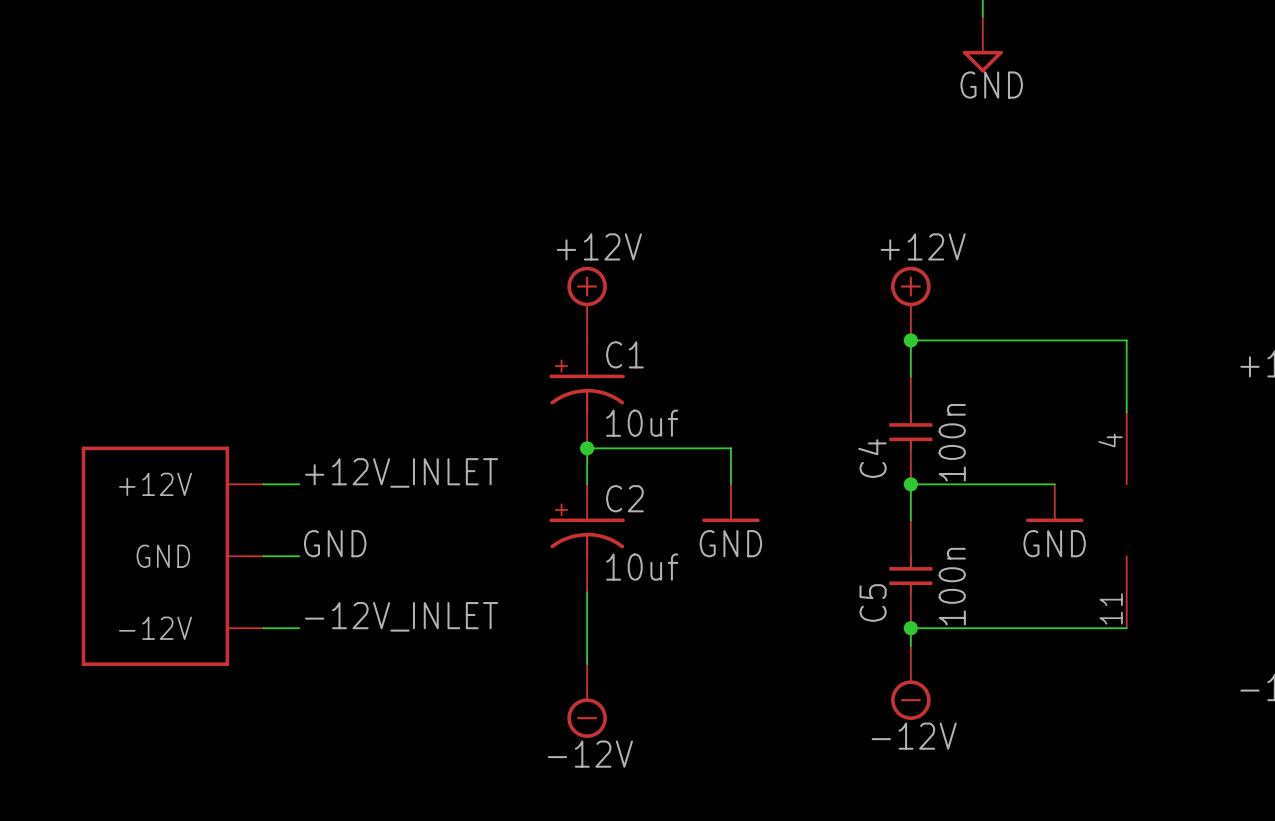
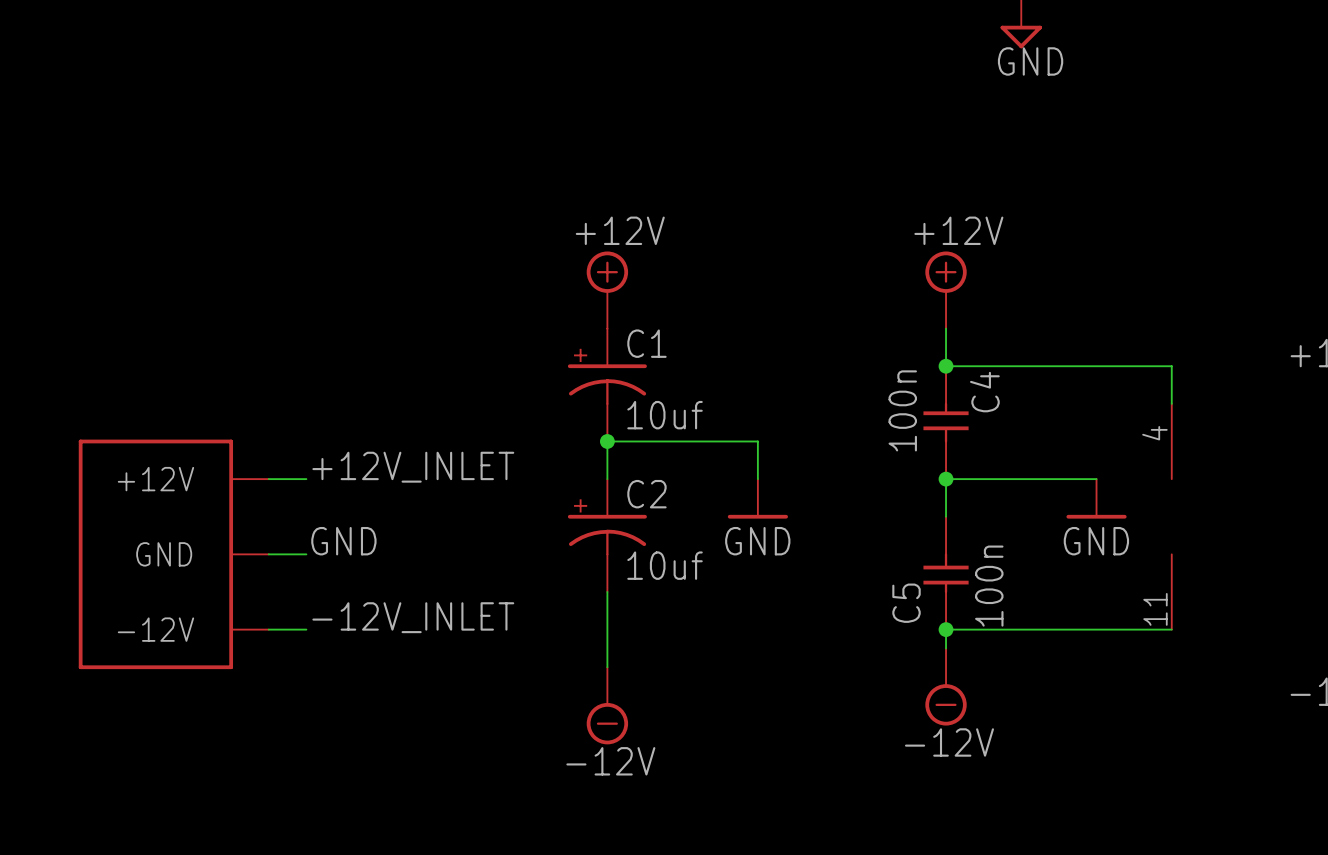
wire: (910, 340) (1126, 340) (1126, 376) -> (946, 366) (1171, 366)
junction position: (910, 340) -> (946, 366)
C4 rotation: 0° (910, 430) -> 180° (946, 422)

